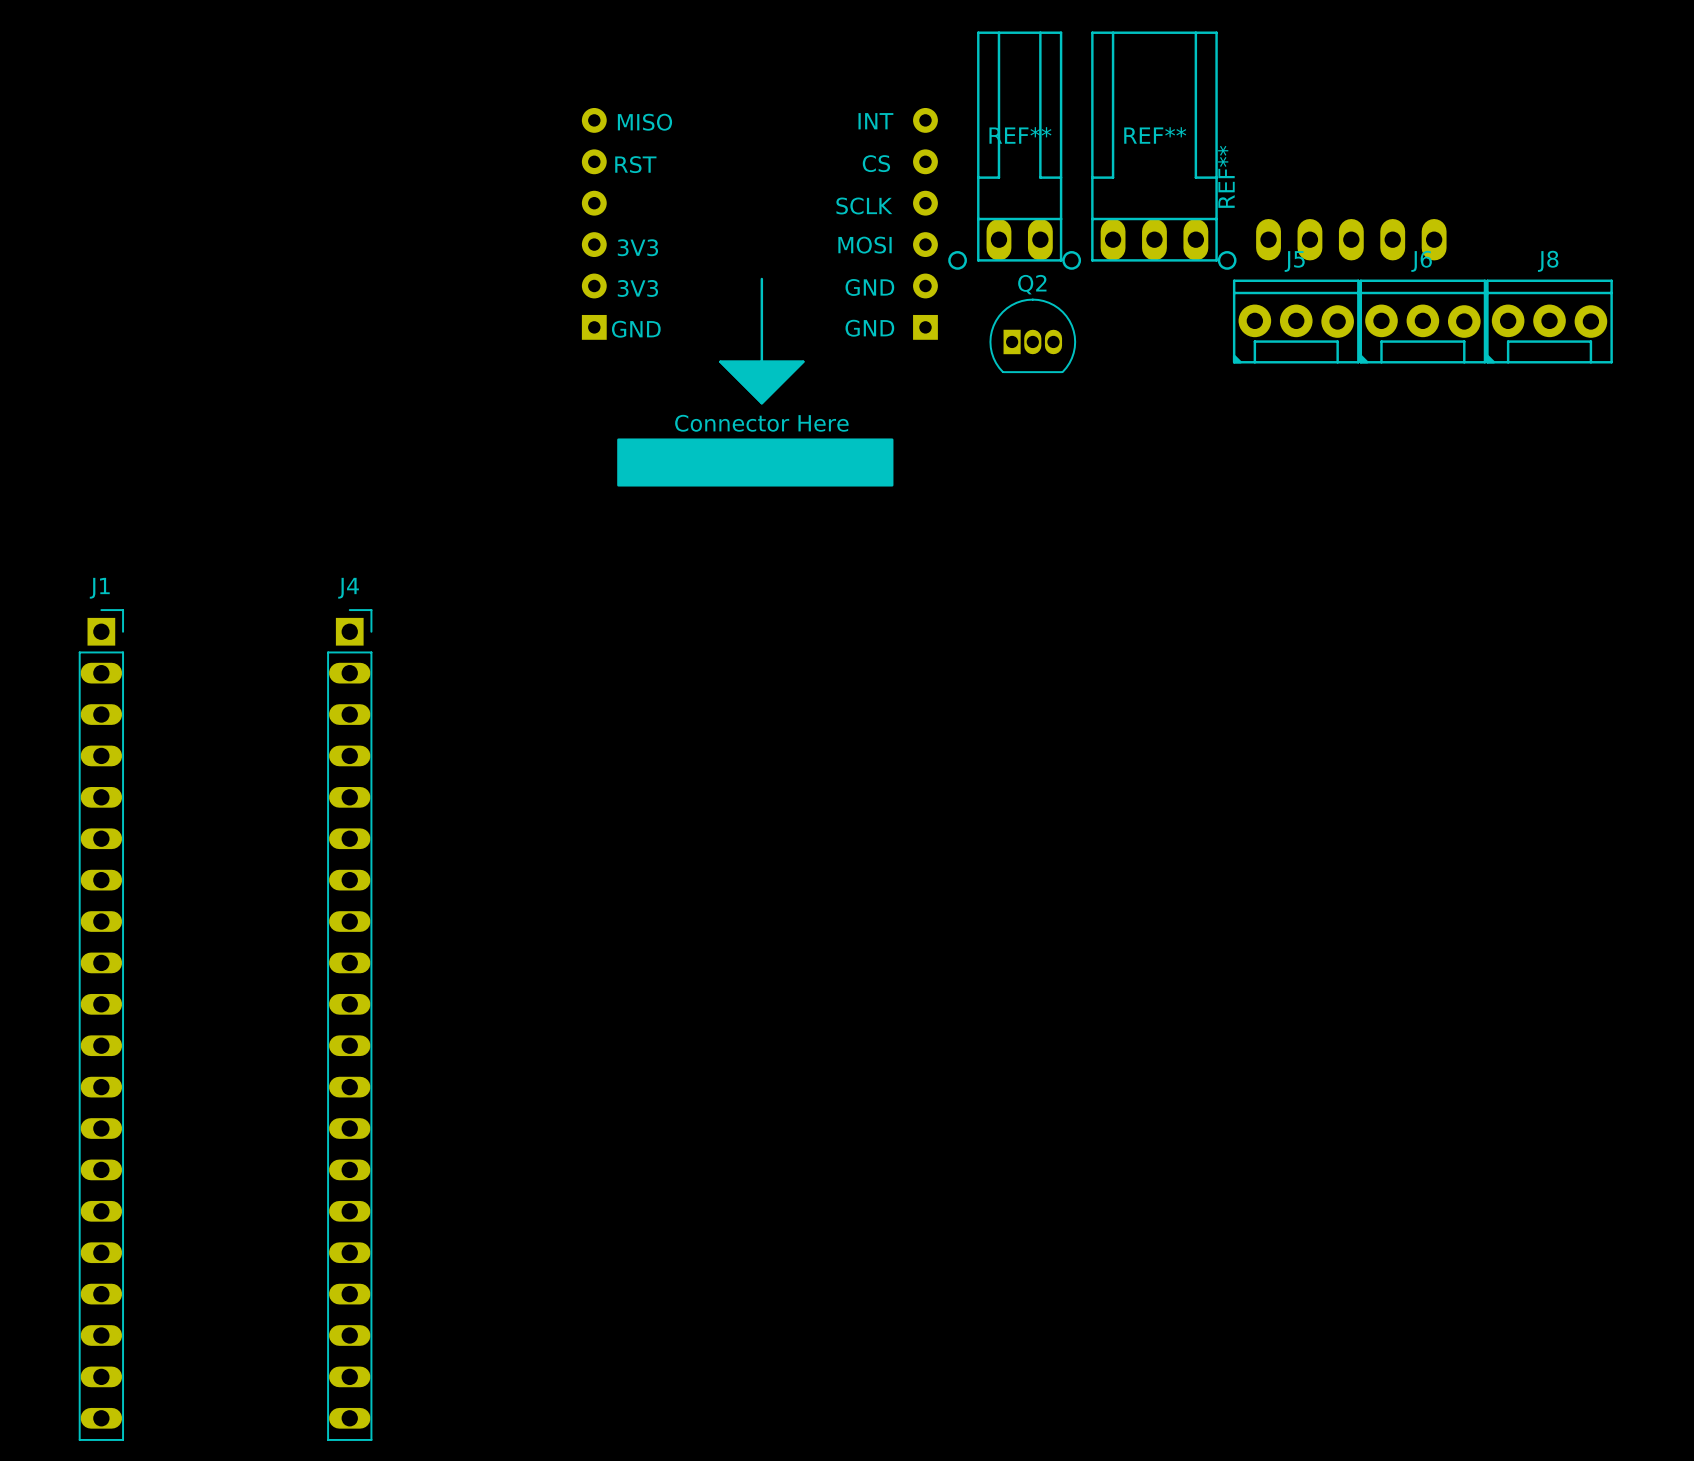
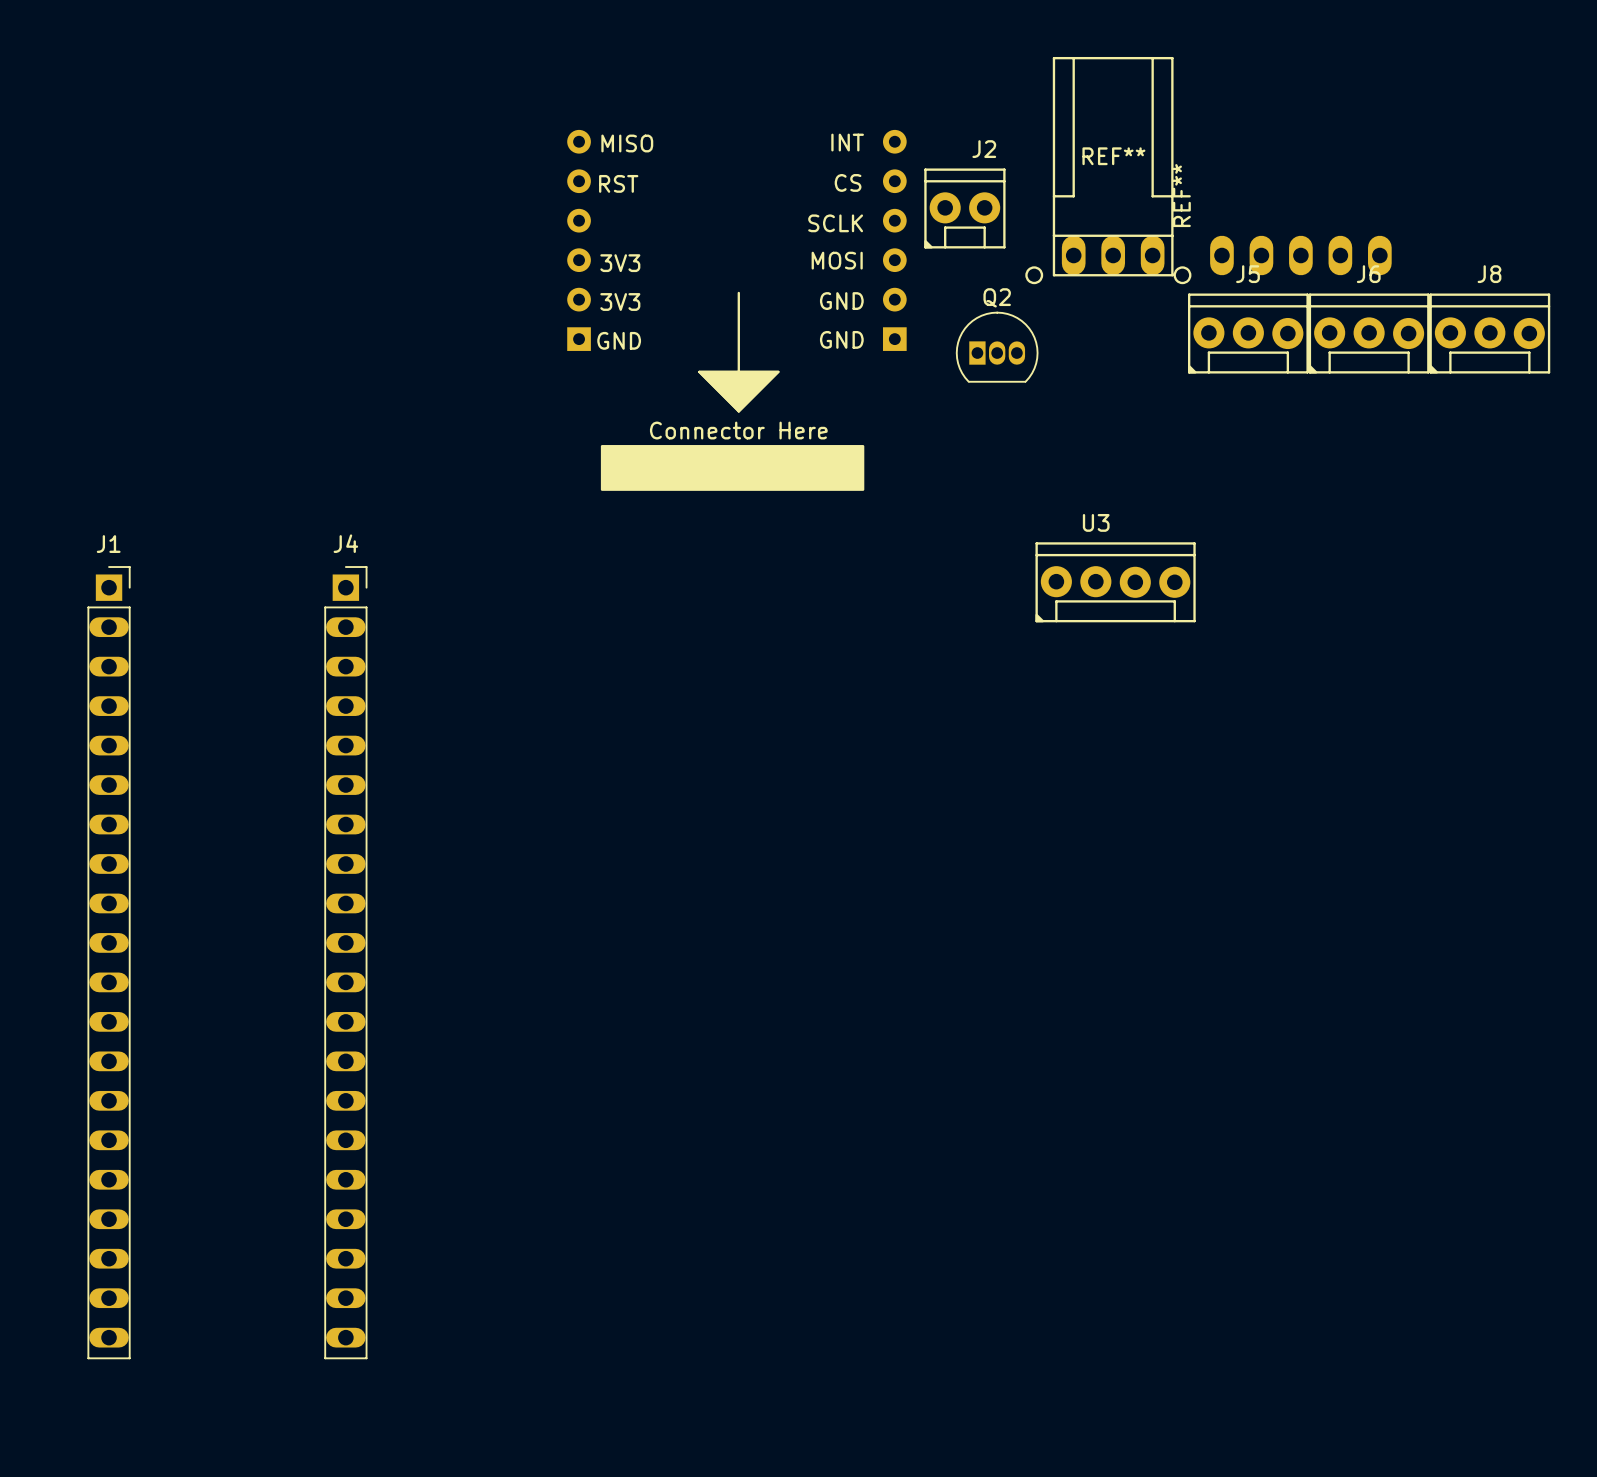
part: (1005, 150) -> none
J2: none -> (964, 208)
U3: none -> (1115, 582)
J1 position: (101, 1025) -> (109, 962)
J4 position: (349, 1025) -> (345, 962)

